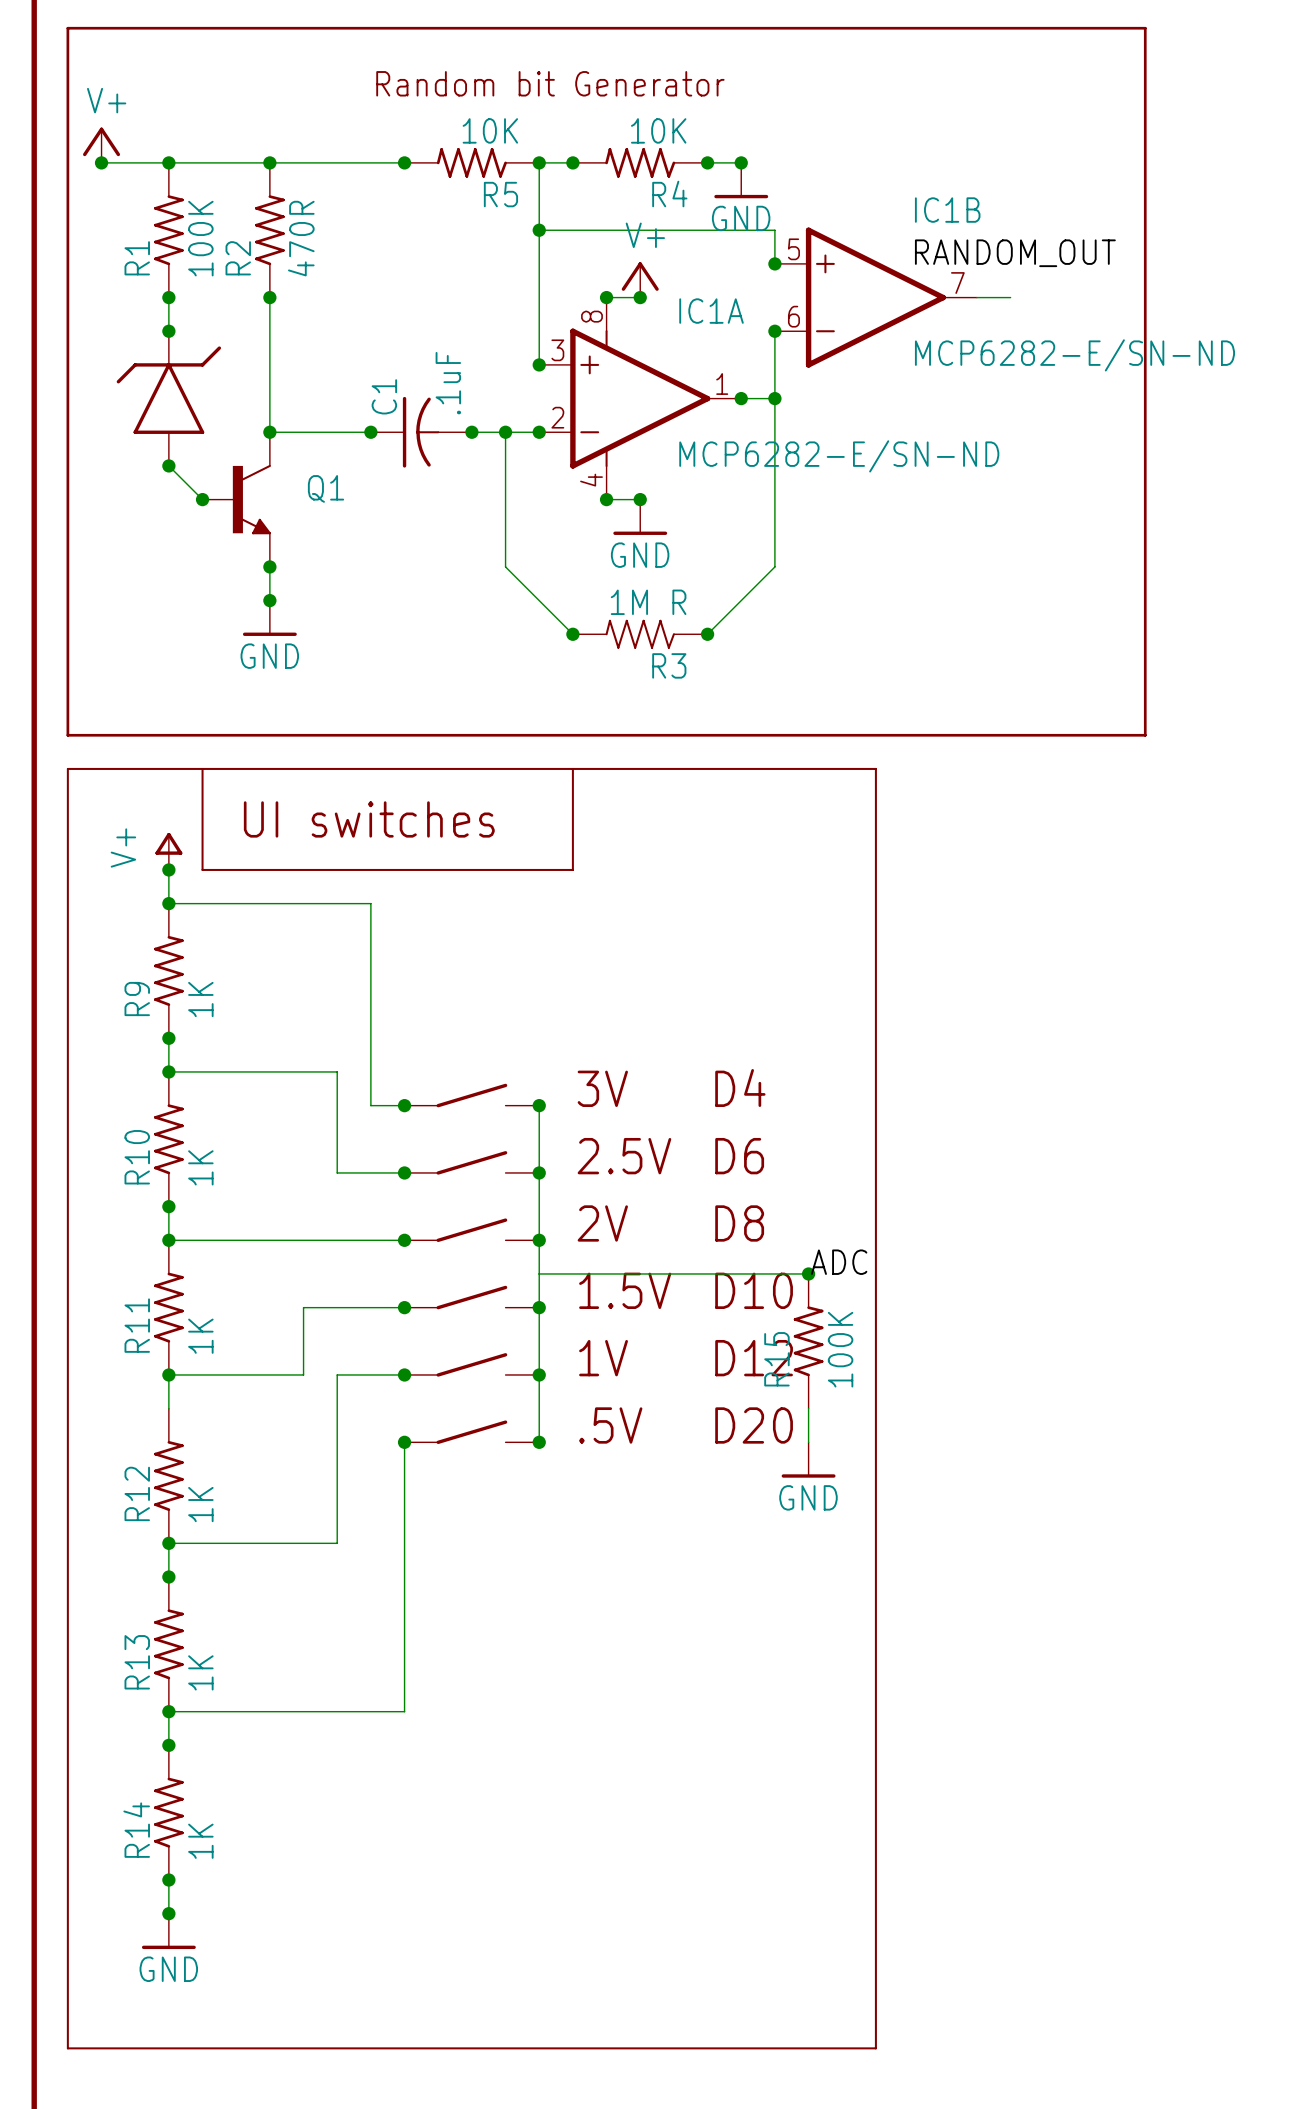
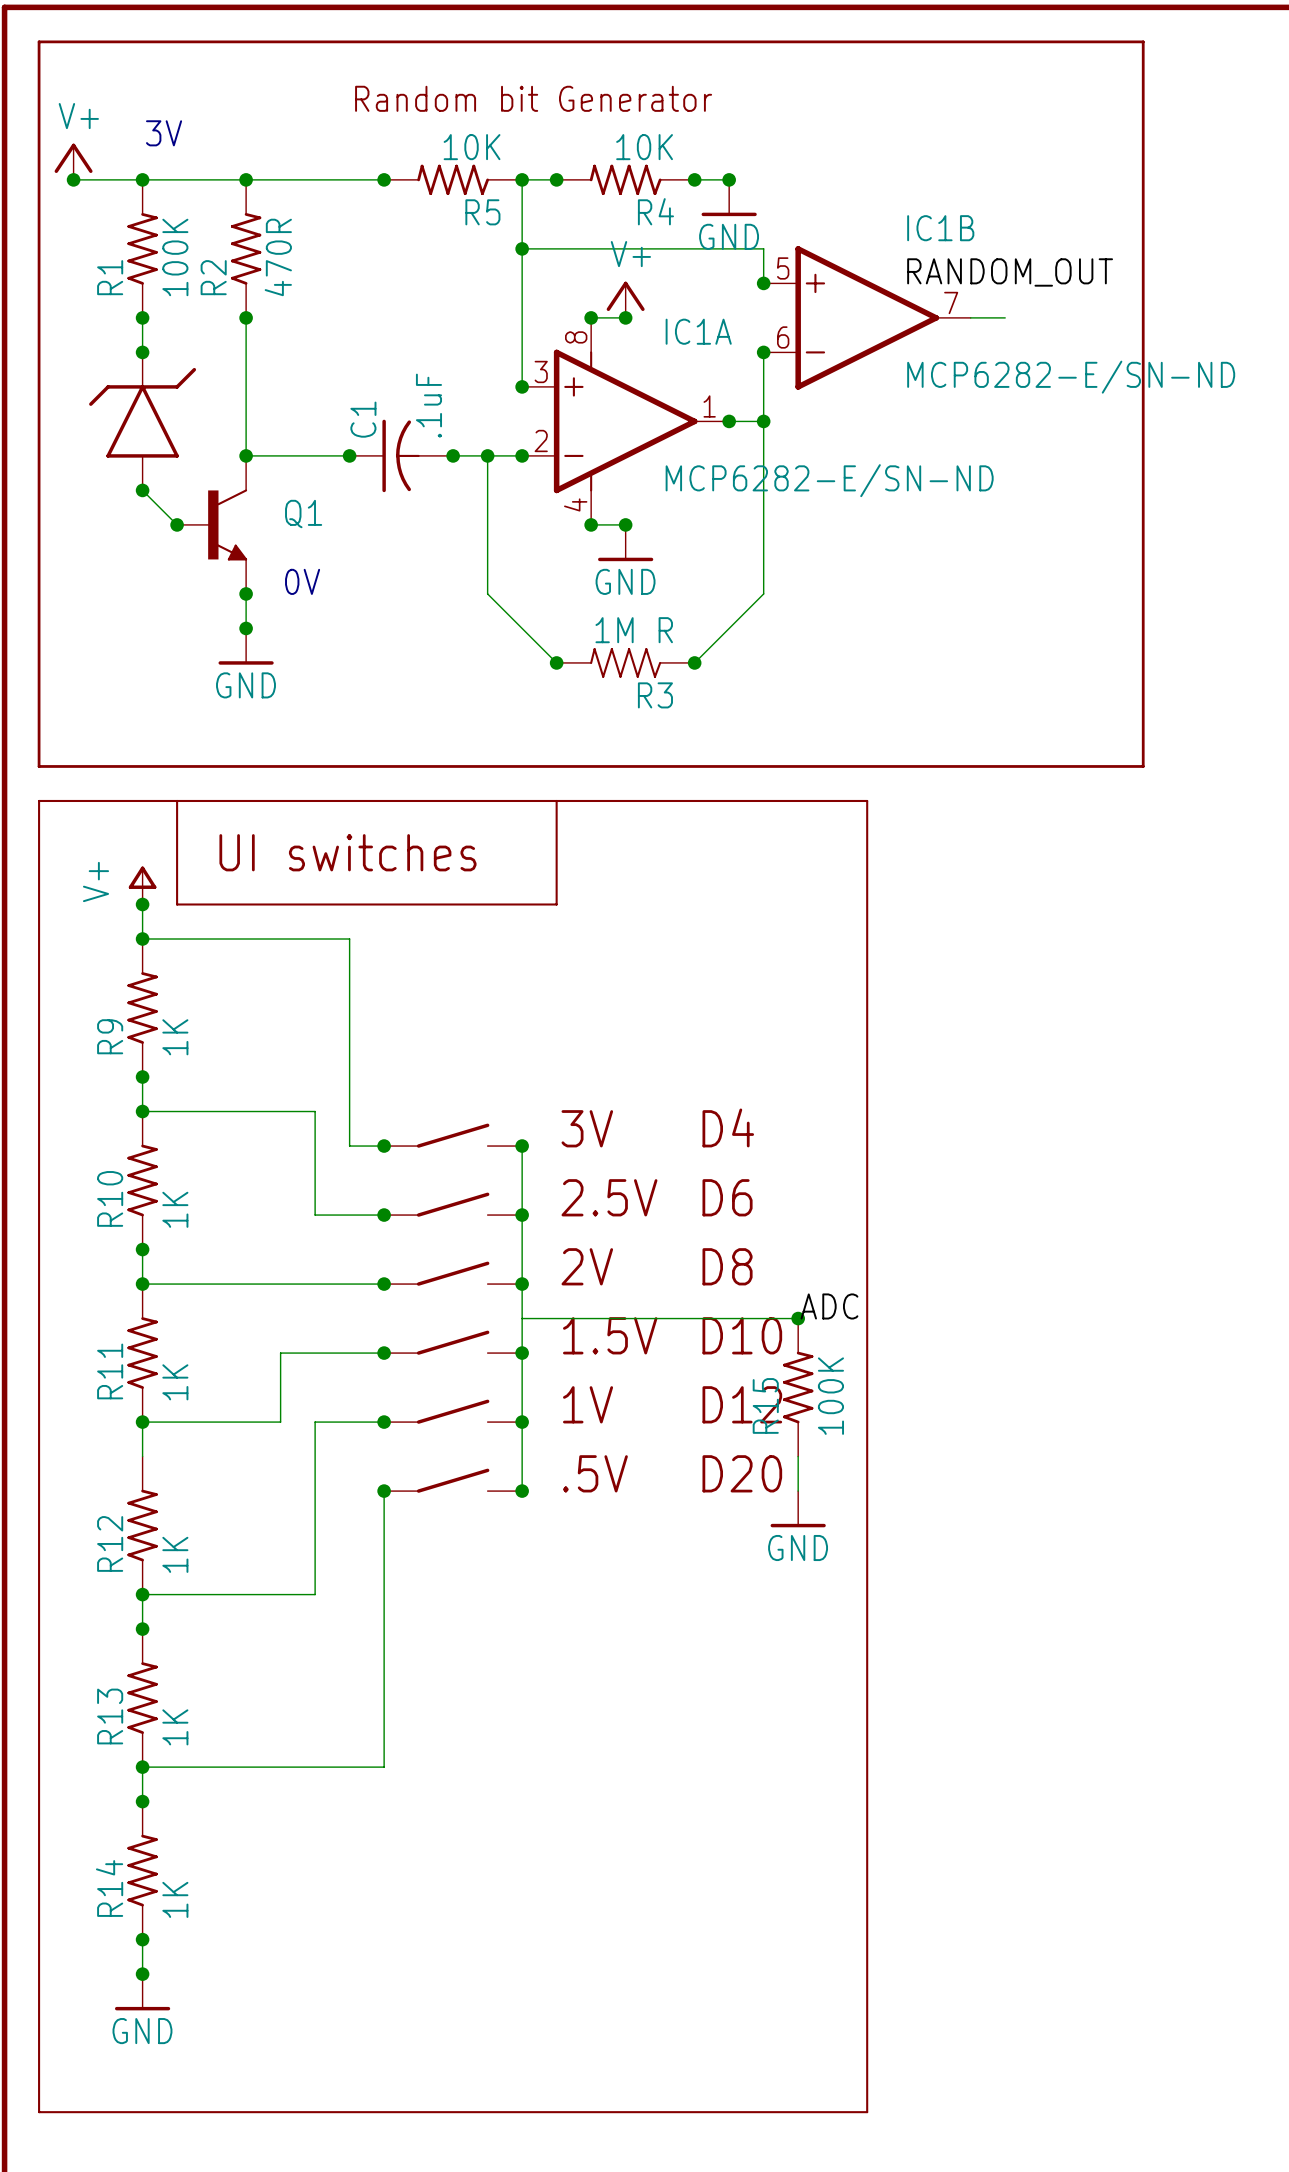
text: none -> 3V (164, 133)
text: none -> 0V (302, 581)

